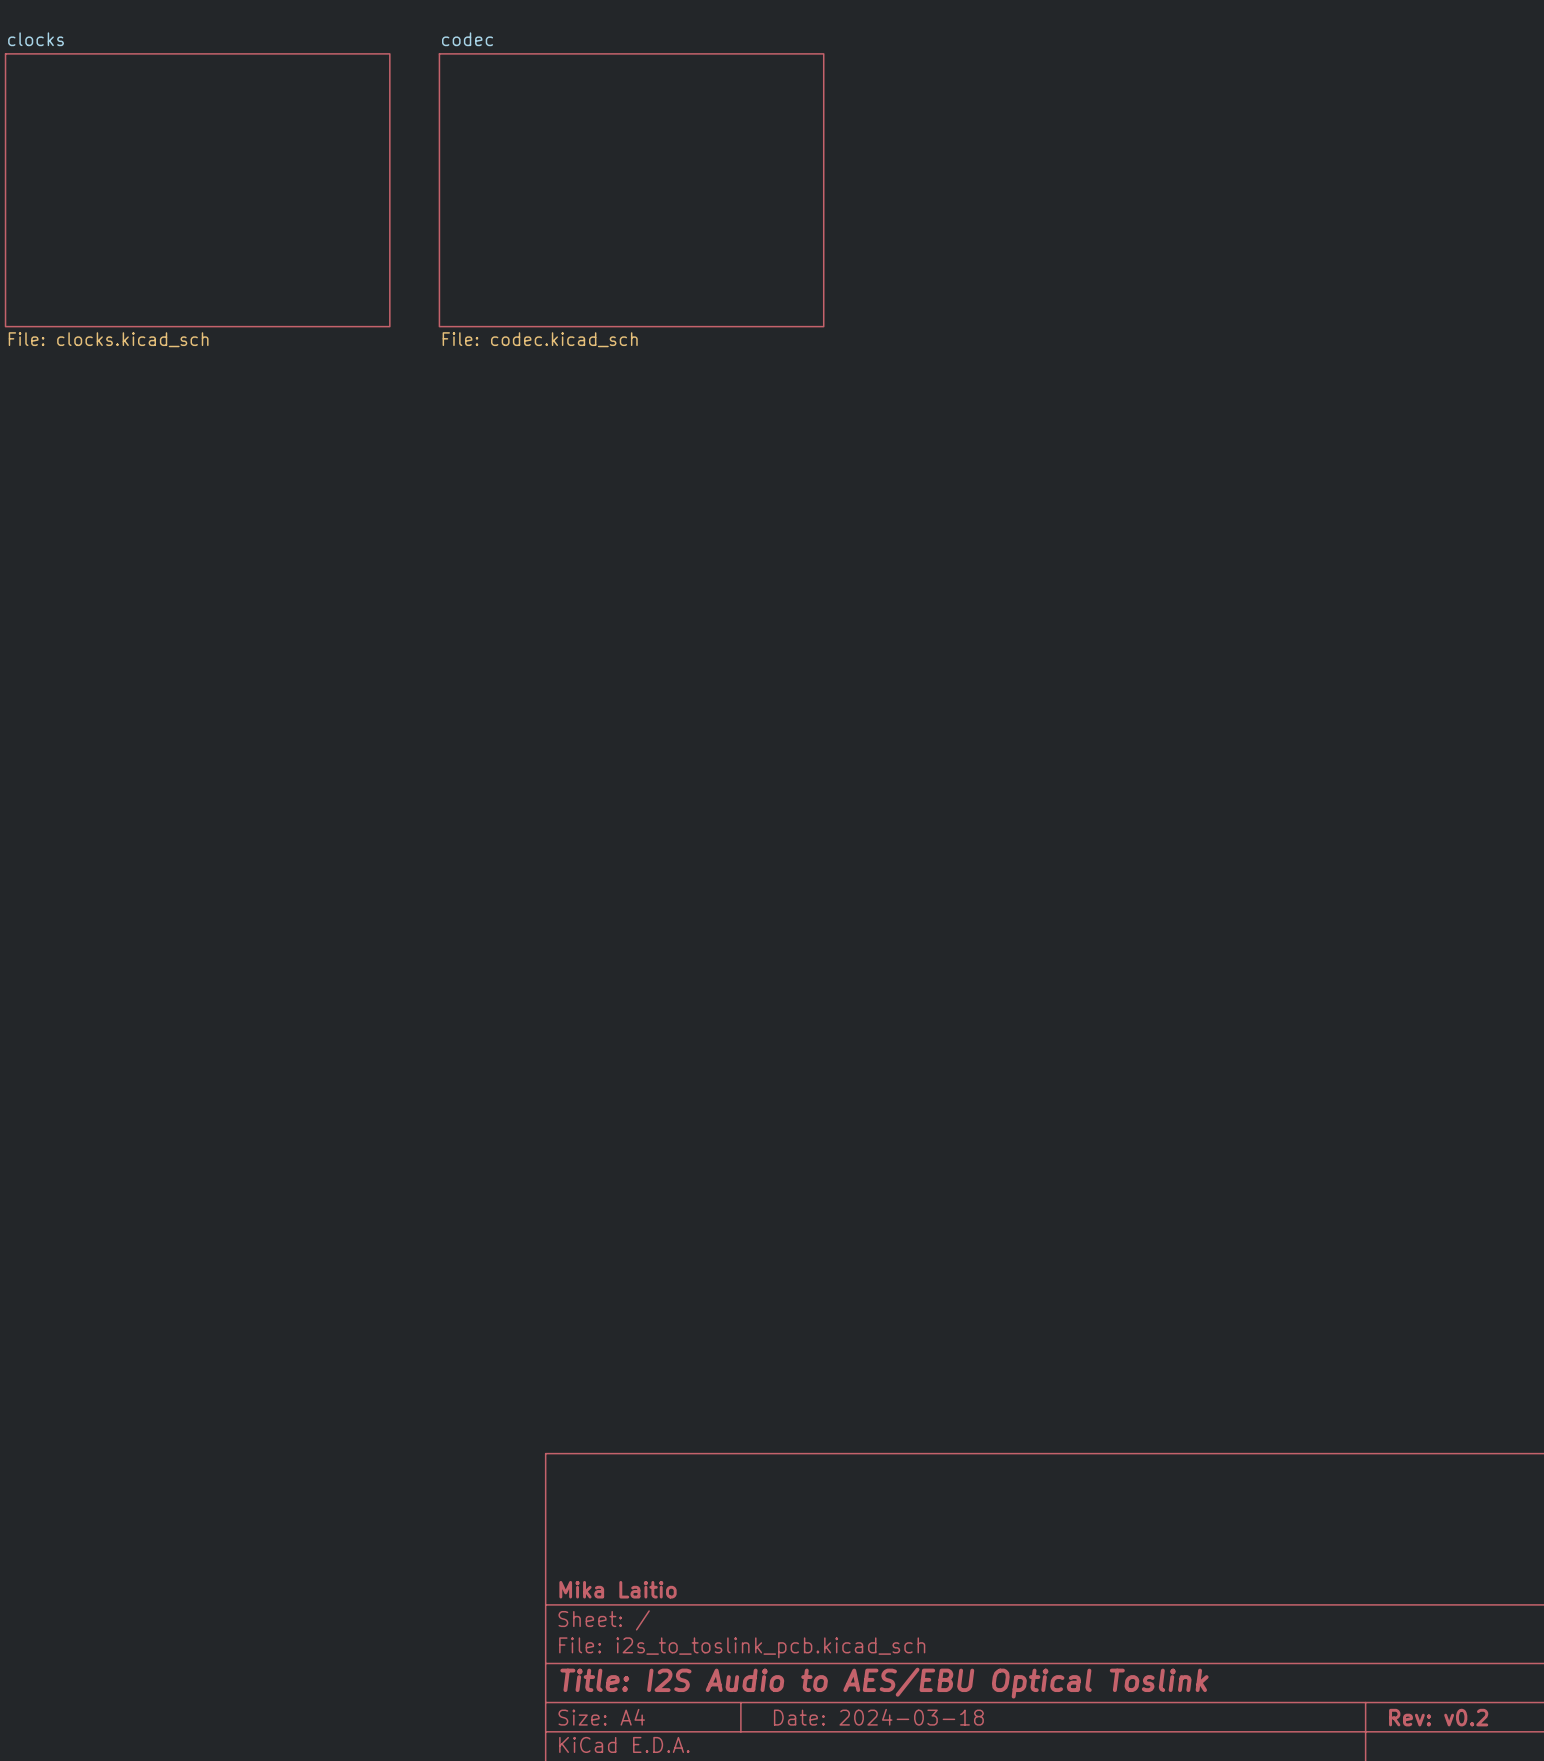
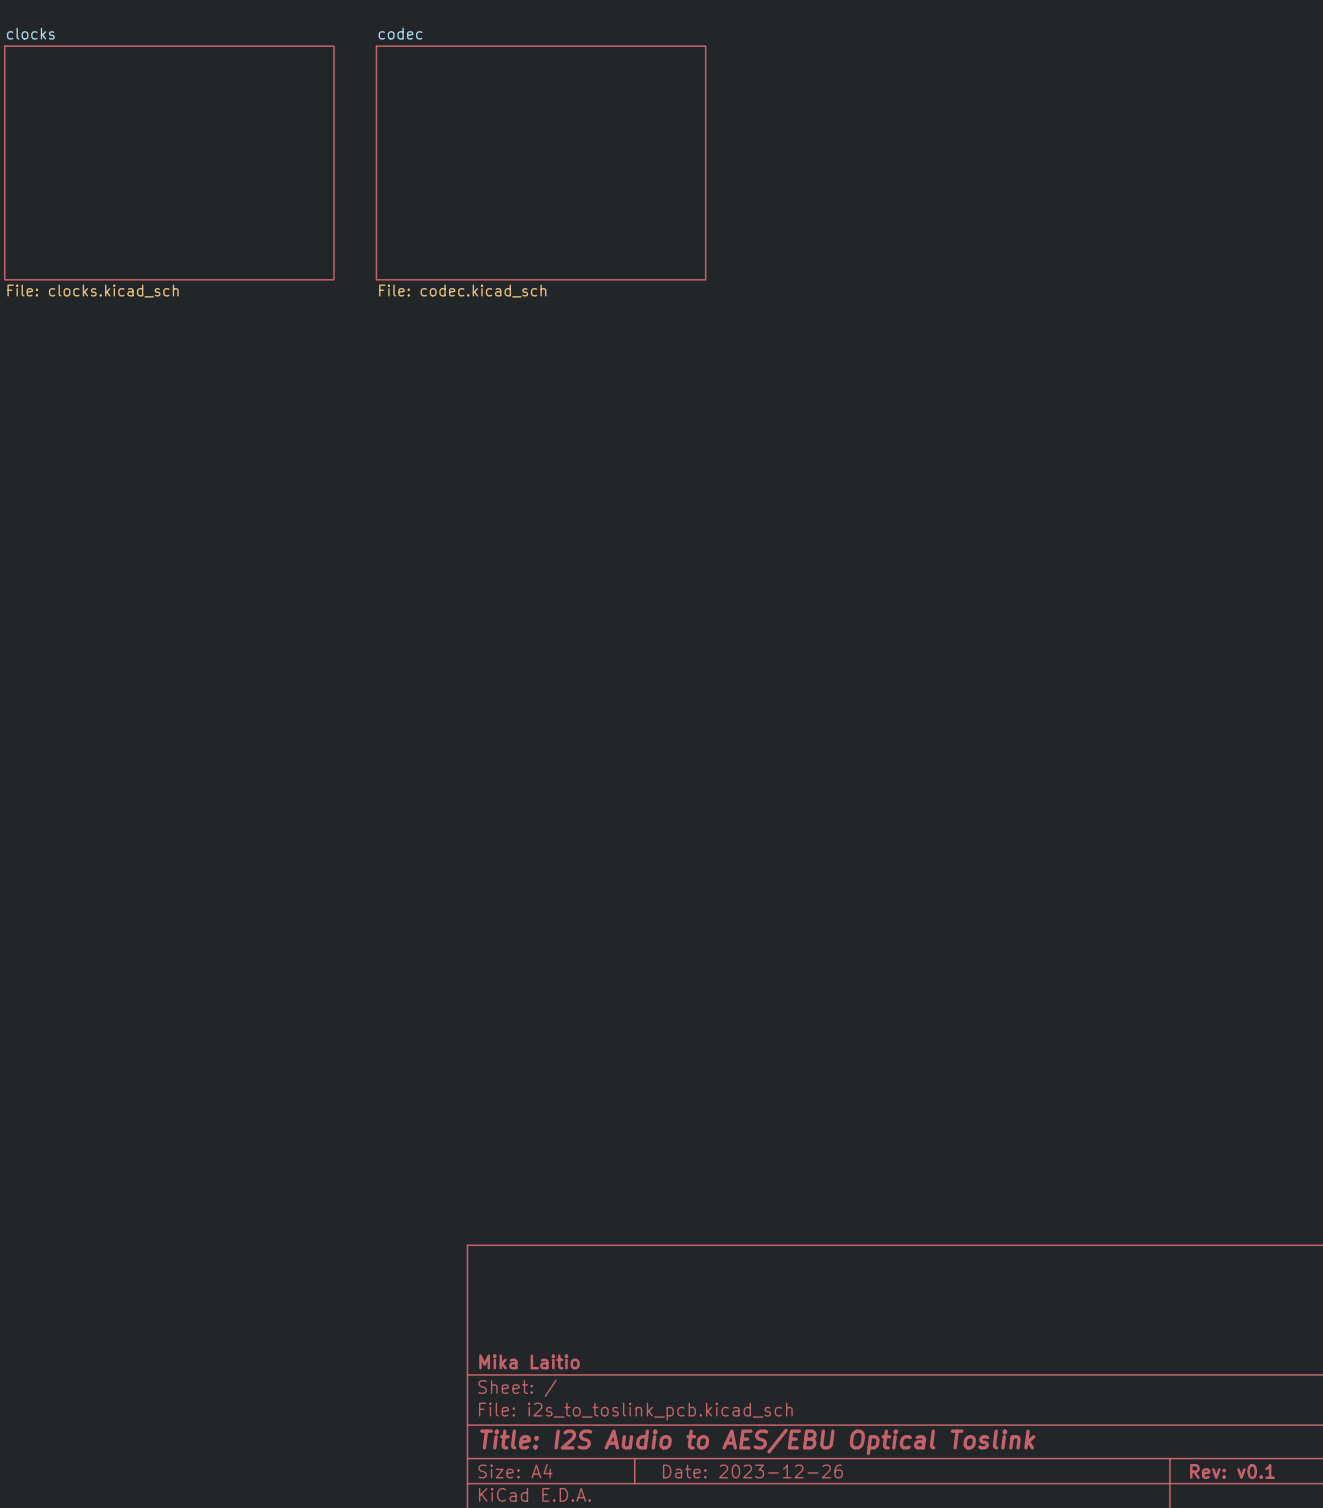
title block: Date: 2024-03-18 (878, 1717) -> Date: 2023-12-26 (752, 1471)
title block: Rev: v0.2 (1438, 1717) -> Rev: v0.1 (1232, 1471)

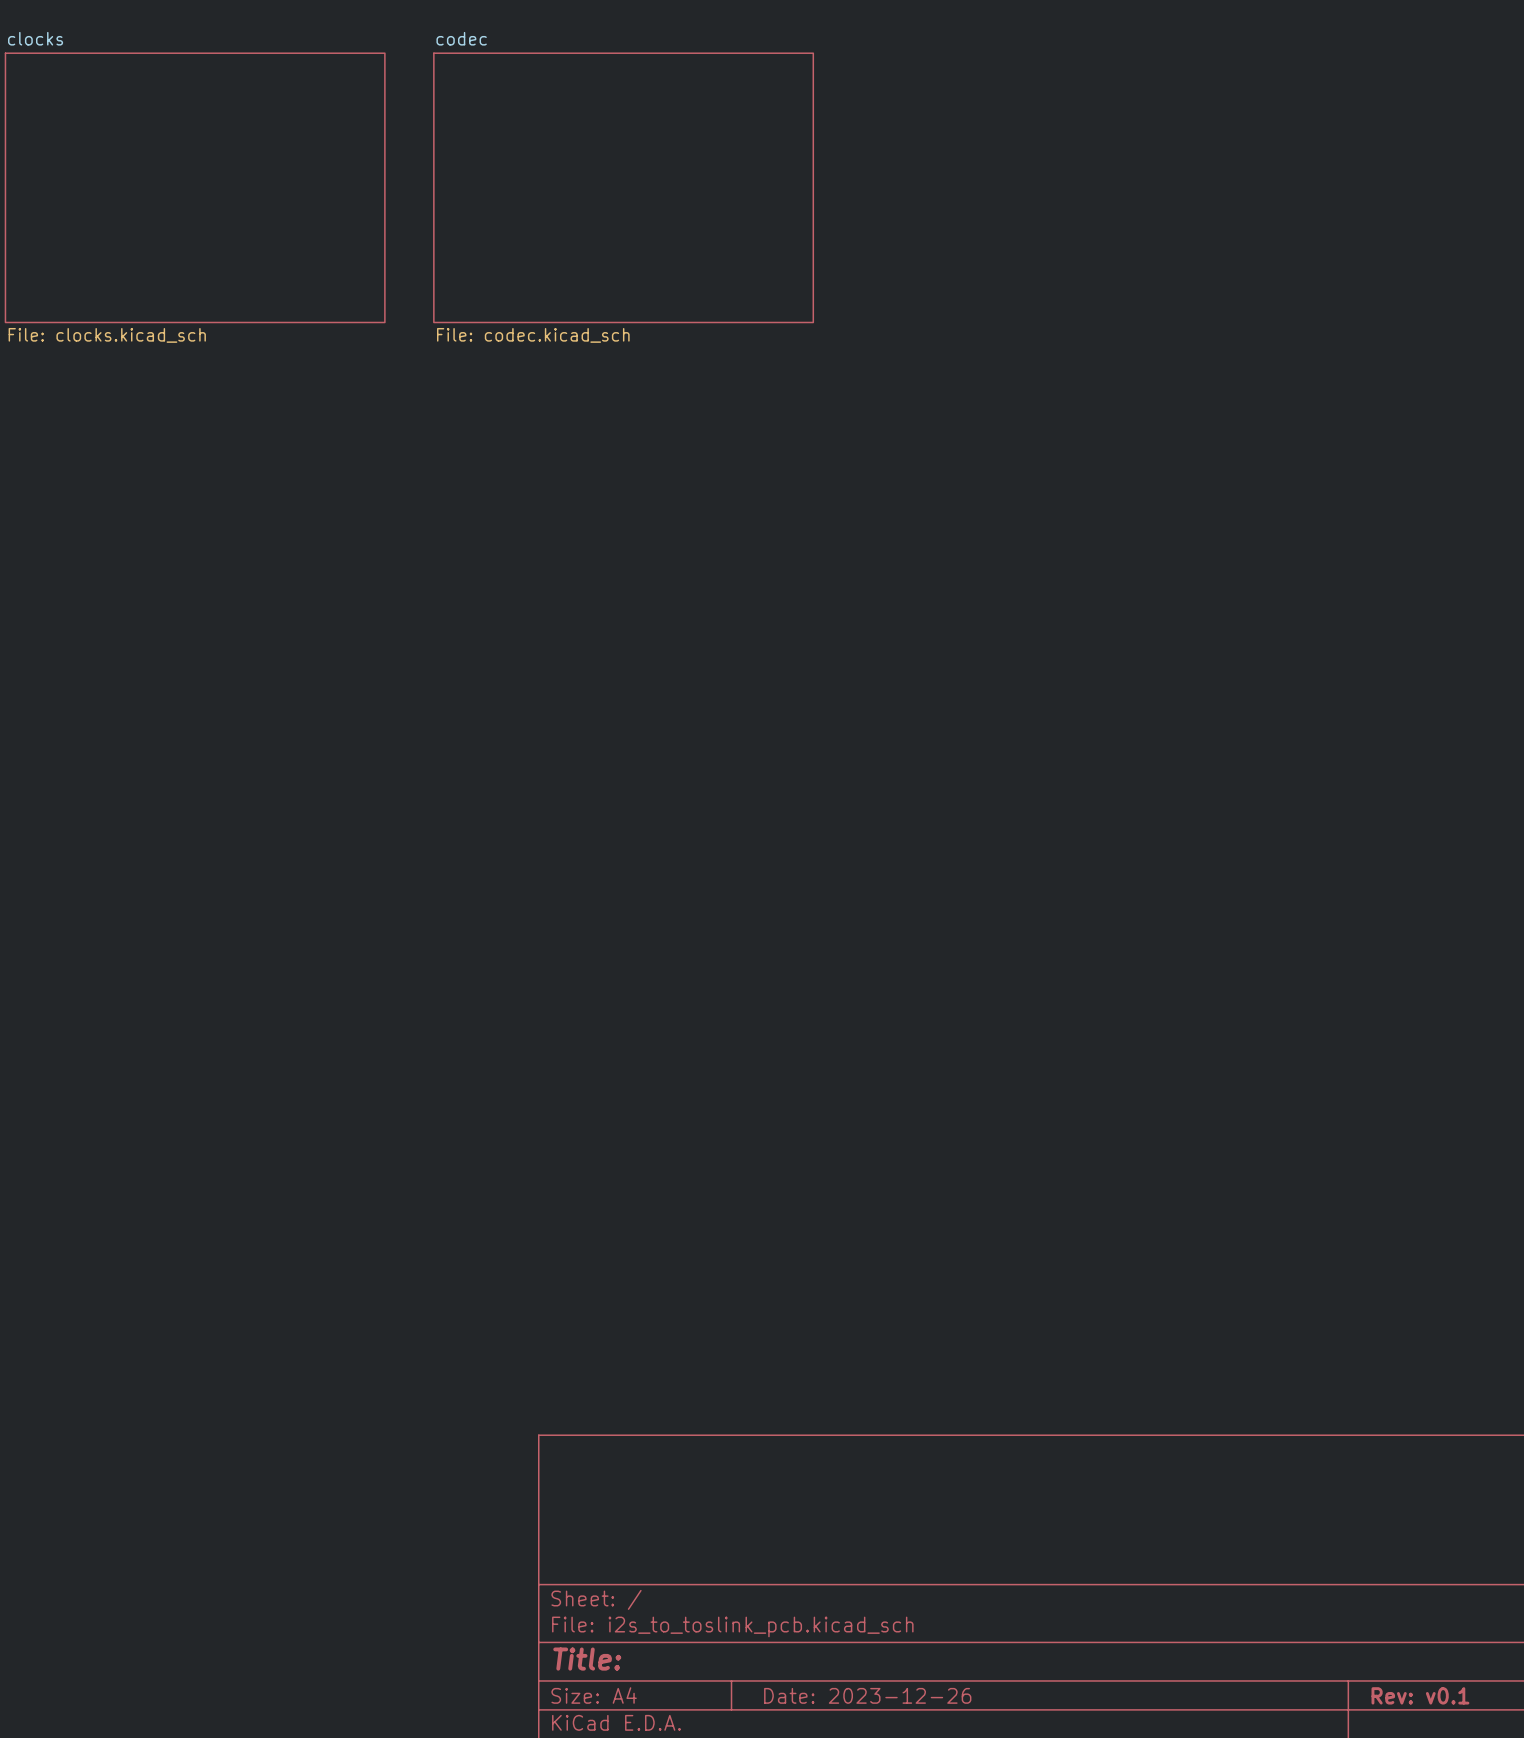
title block: Mika Laitio (529, 1361) -> none
title block: Title: I2S Audio to AES/EBU Optical Toslink (757, 1441) -> Title: (587, 1659)

